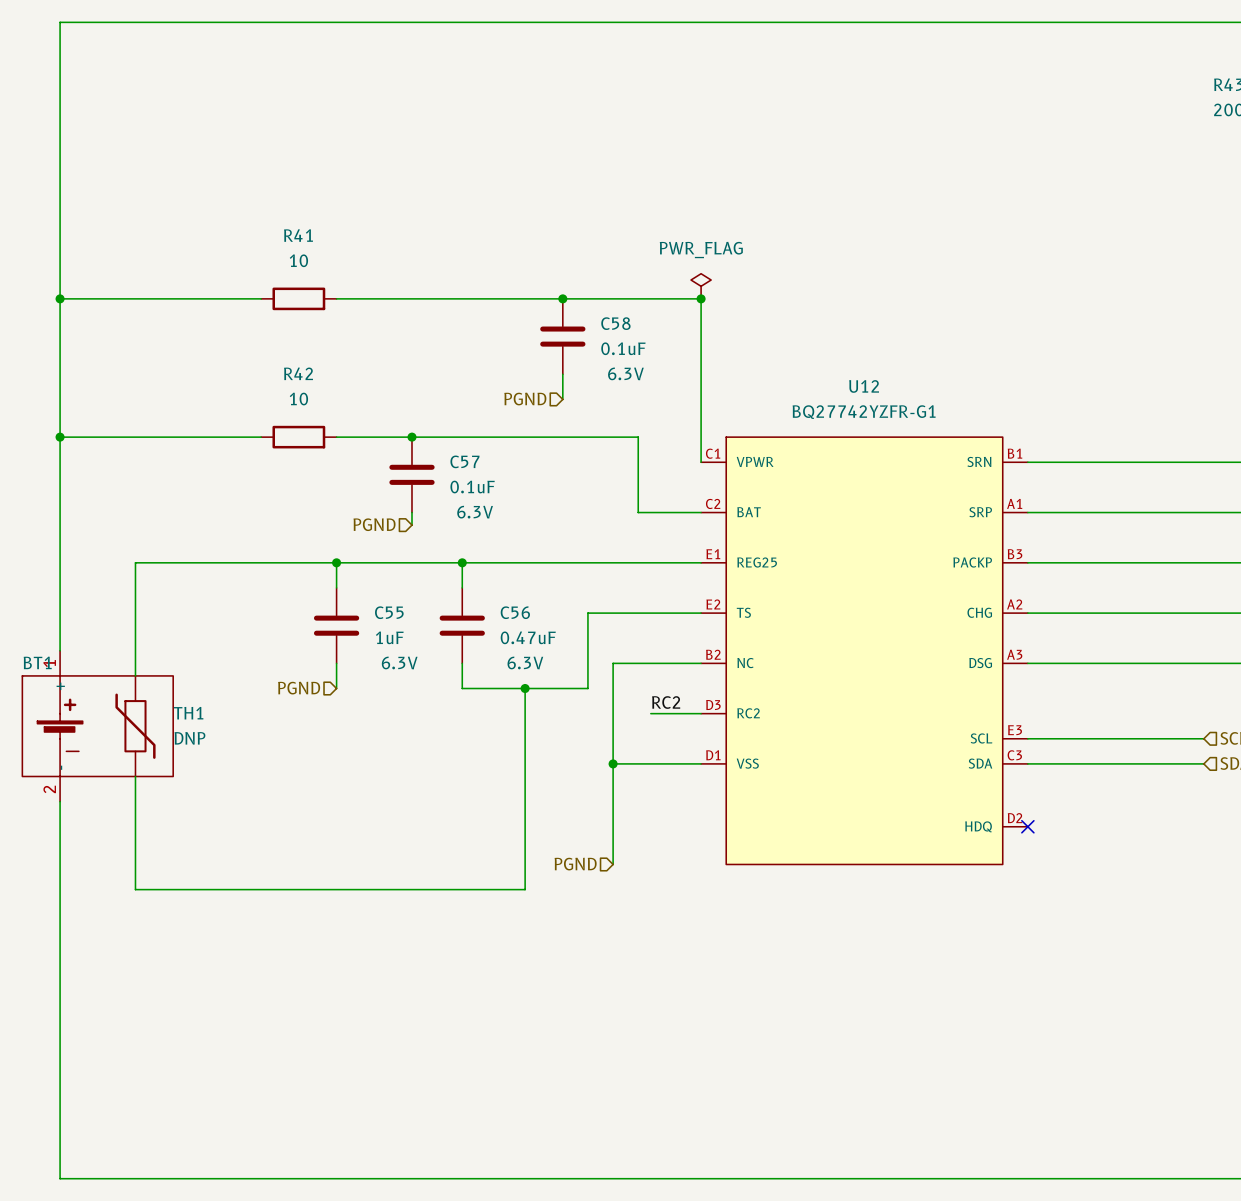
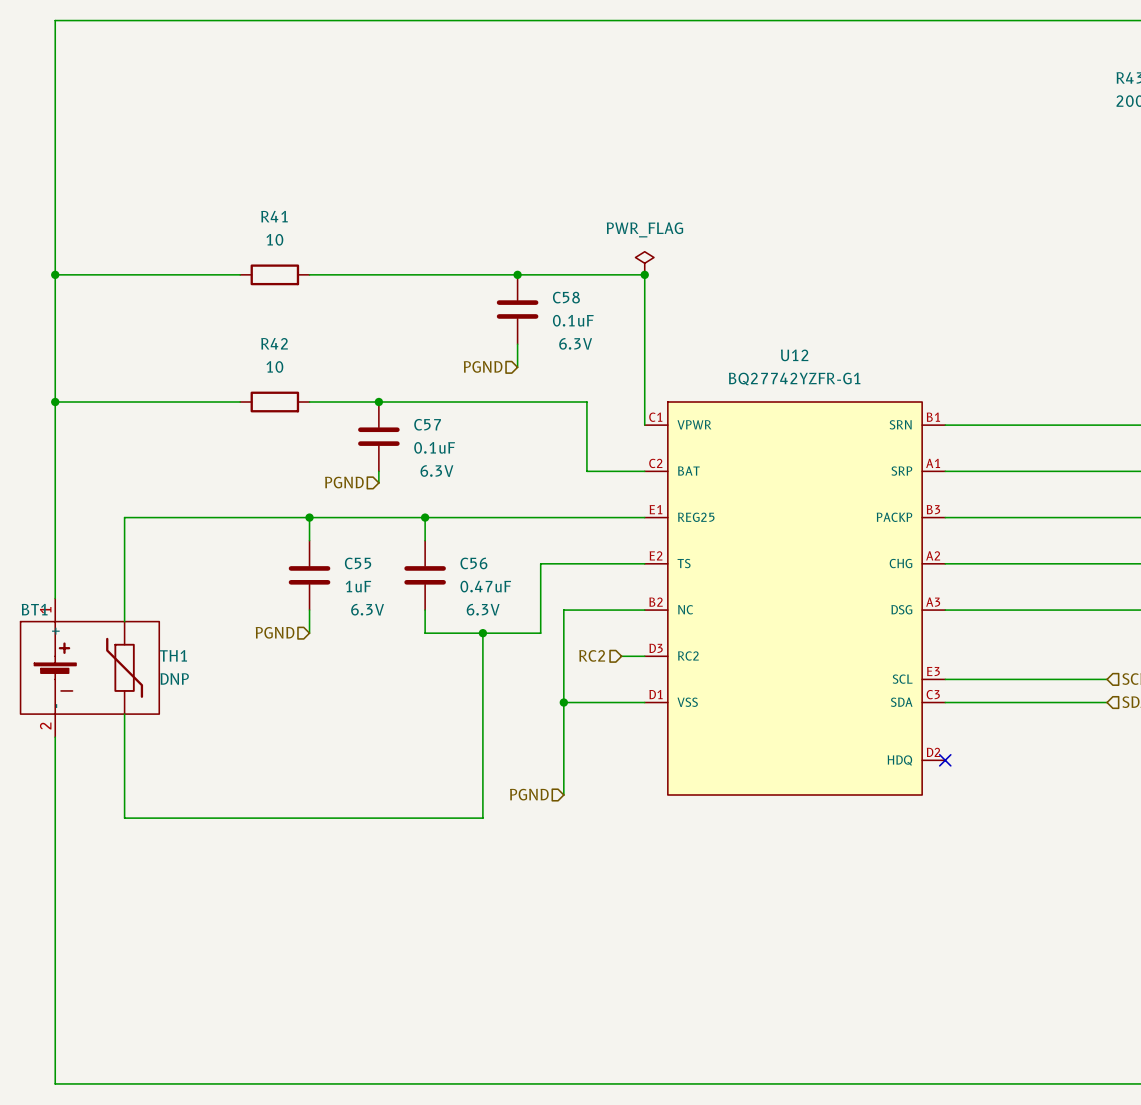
label: RC2 (666, 702) -> none
hierarchical label: none -> RC2 (592, 655)
wire: (650, 713) (675, 713) -> none

